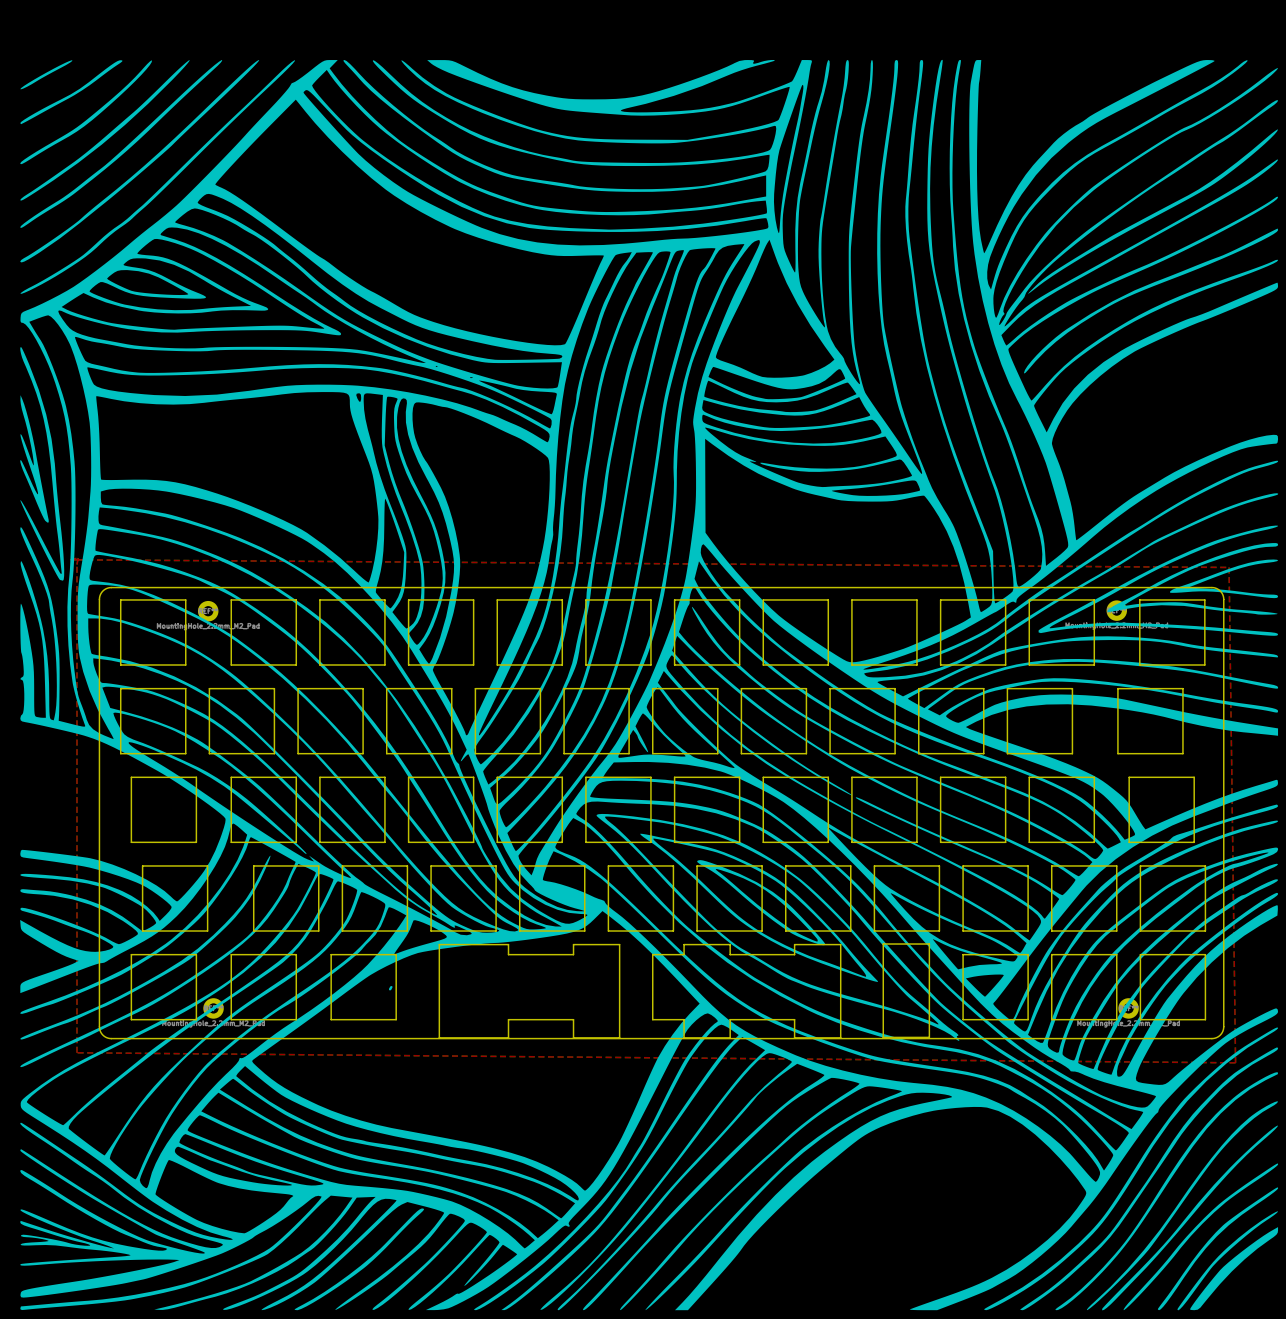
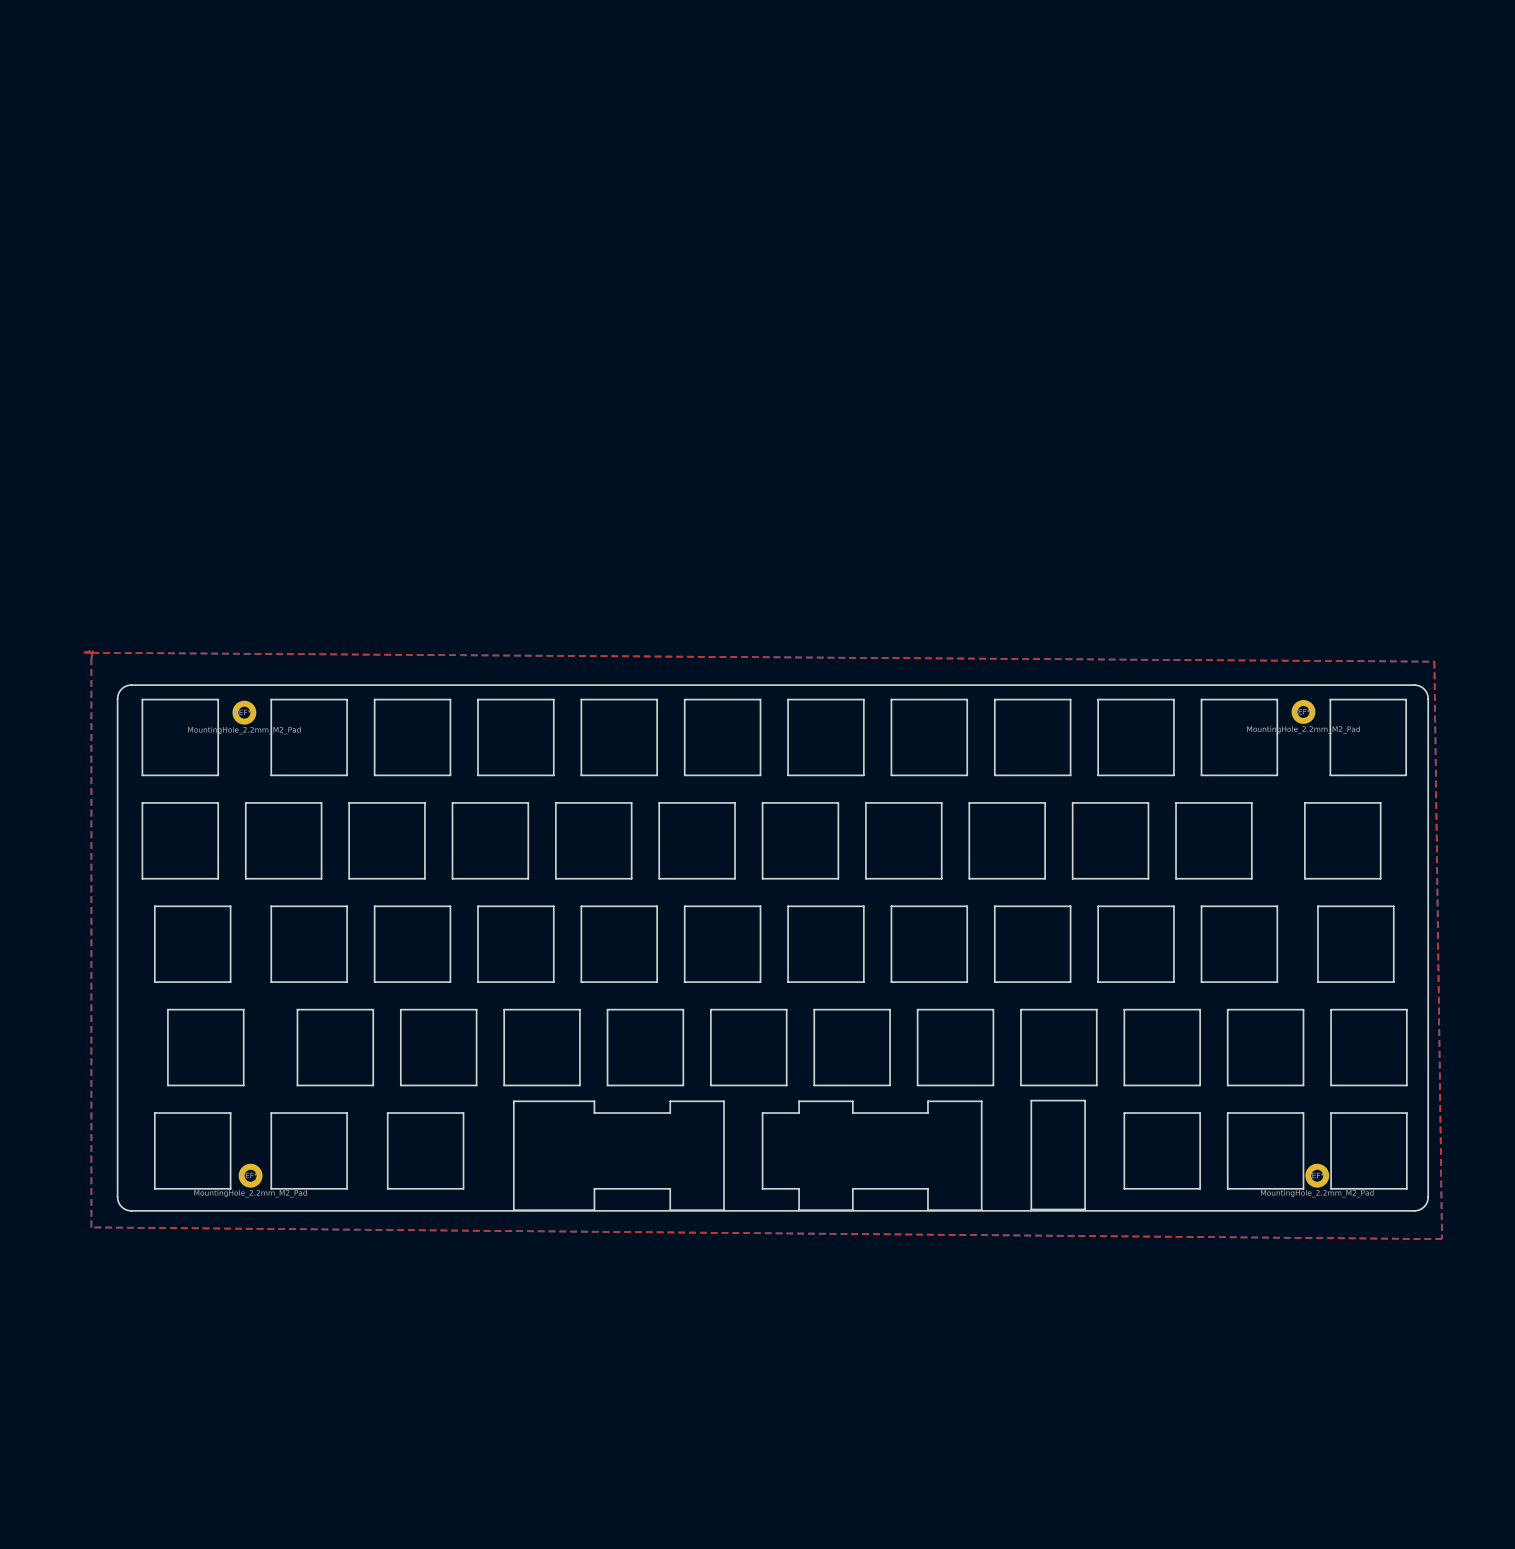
drawing: [20, 59, 1279, 1311] -> none

